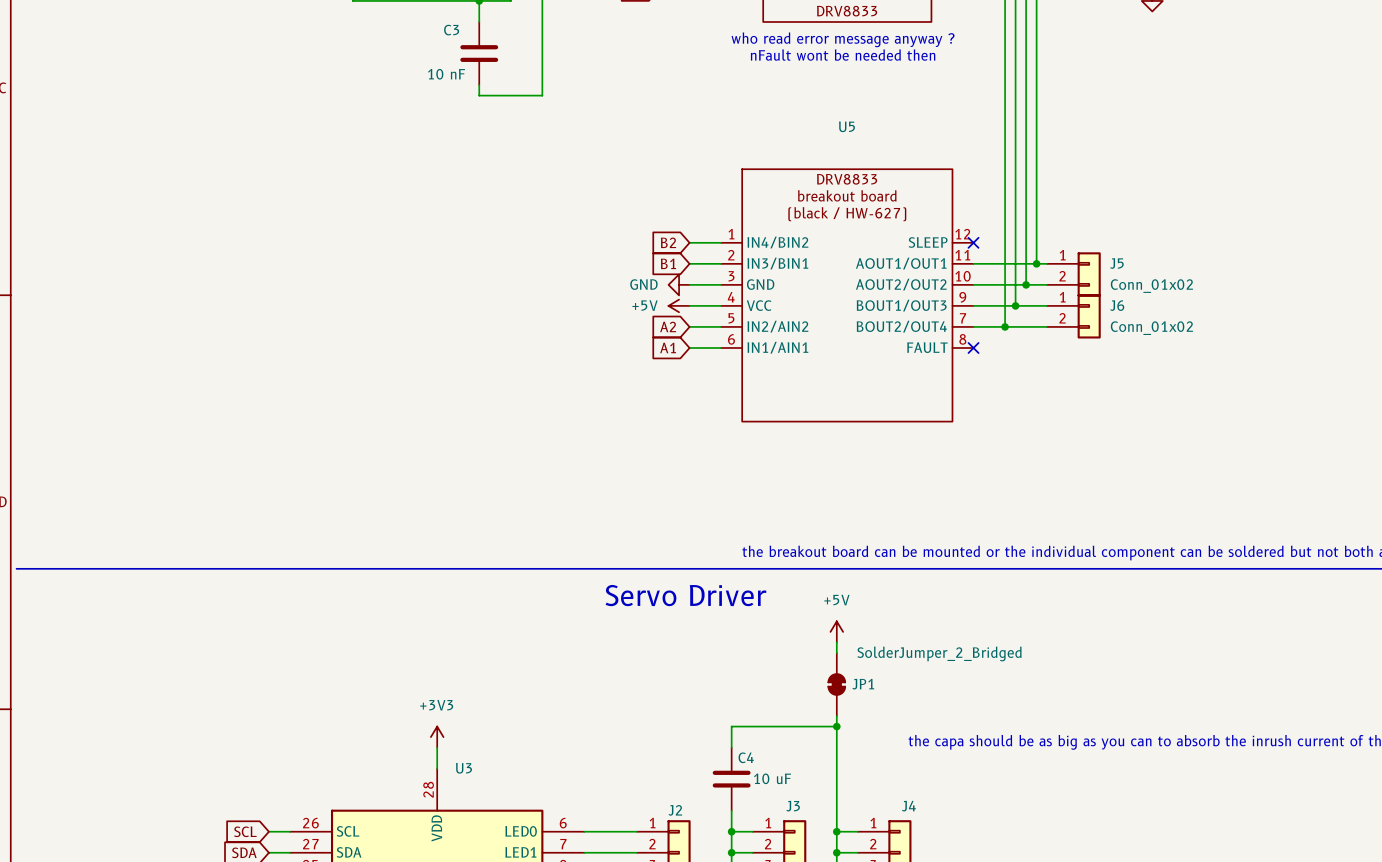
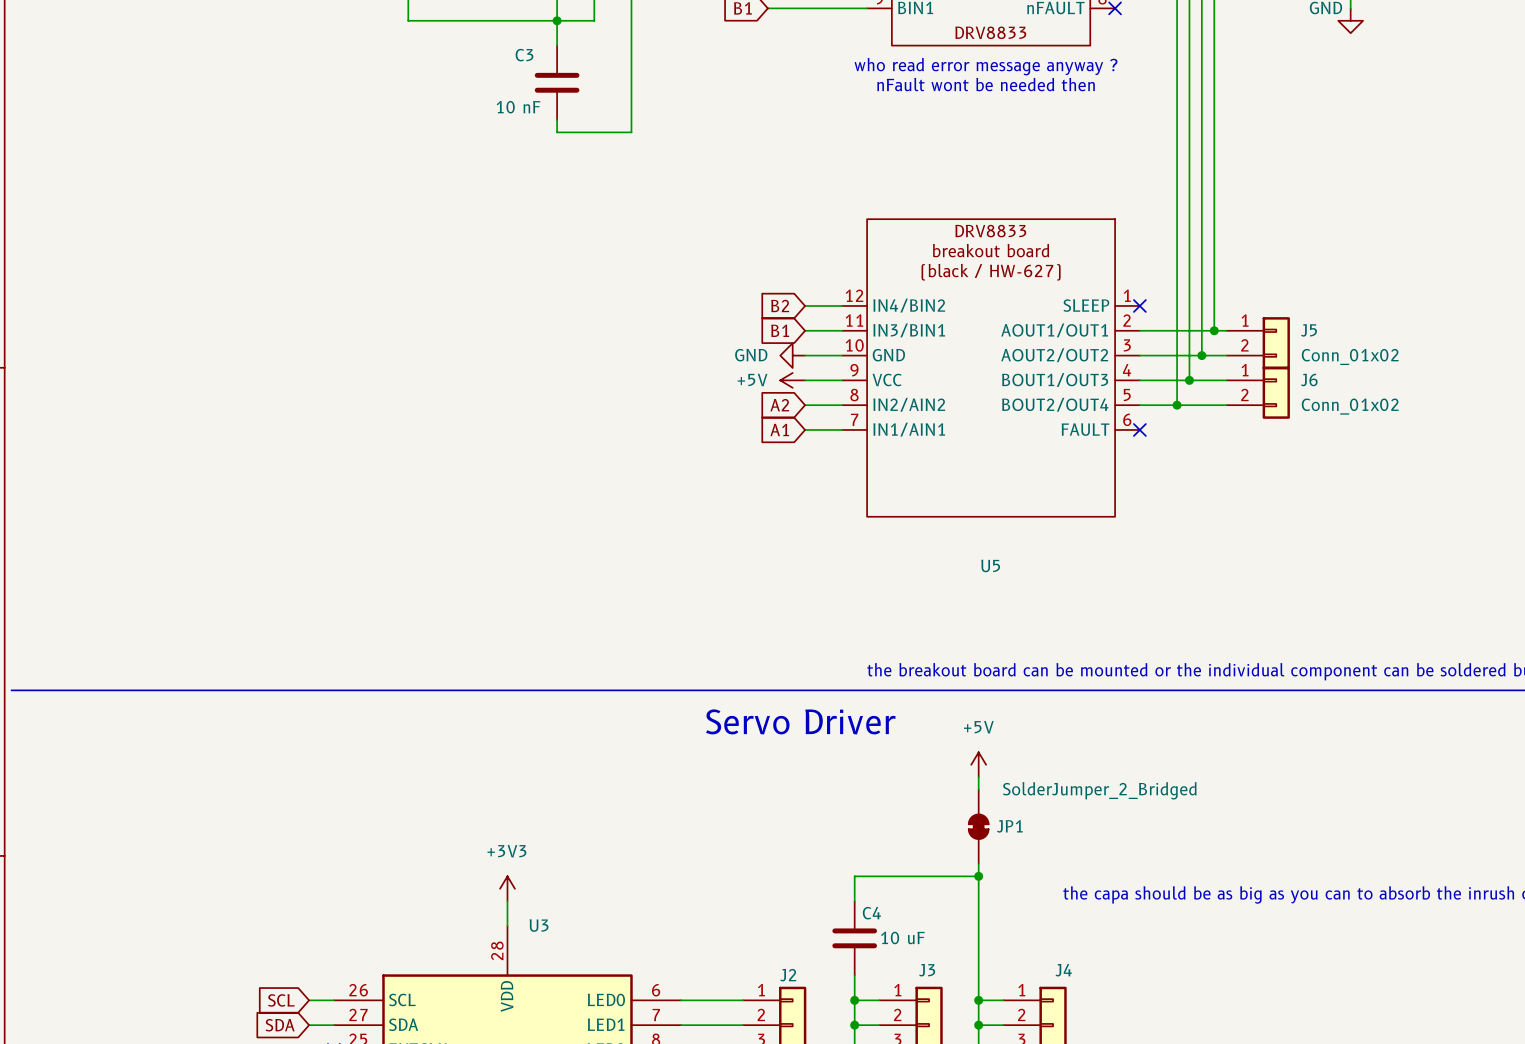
U5 name position: U5 (846, 126) -> U5 (990, 565)
U5 symbol: [721, 169, 974, 422] -> [842, 219, 1140, 517]

